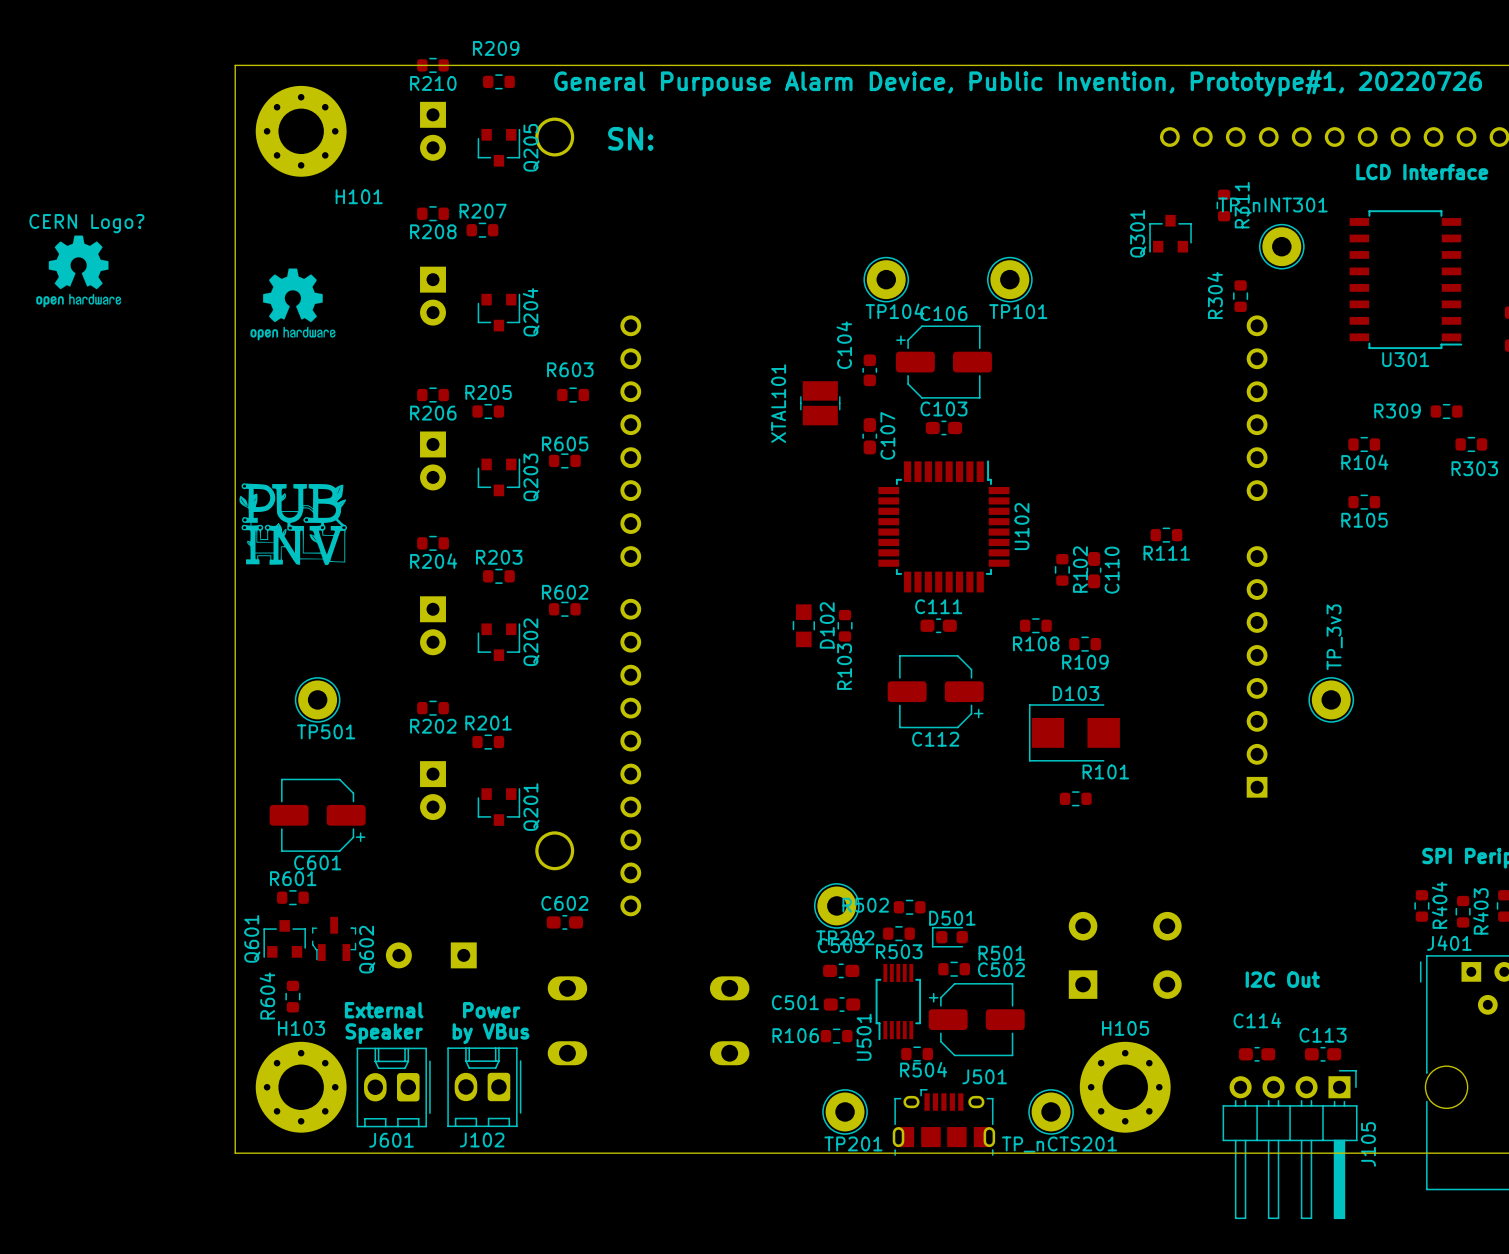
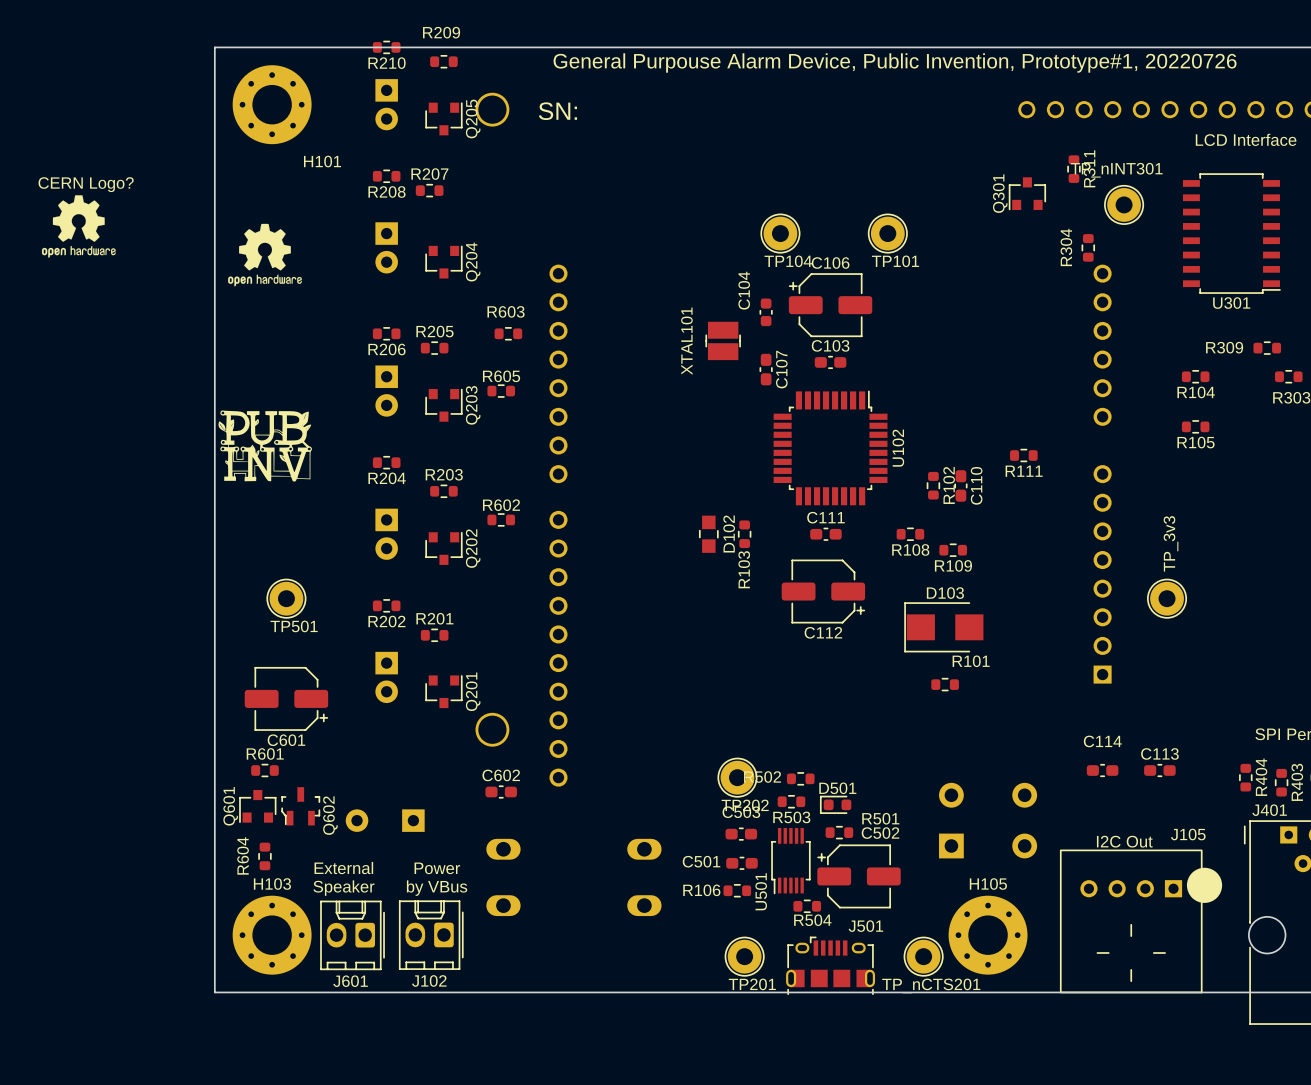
C114 position: (1257, 1054) -> (1102, 770)
C113 position: (1323, 1054) -> (1159, 770)
J105 footprint: [1222, 1069, 1358, 1220] -> [1060, 849, 1223, 994]
J105 name position: J105 (1368, 1144) -> J105 (1188, 834)

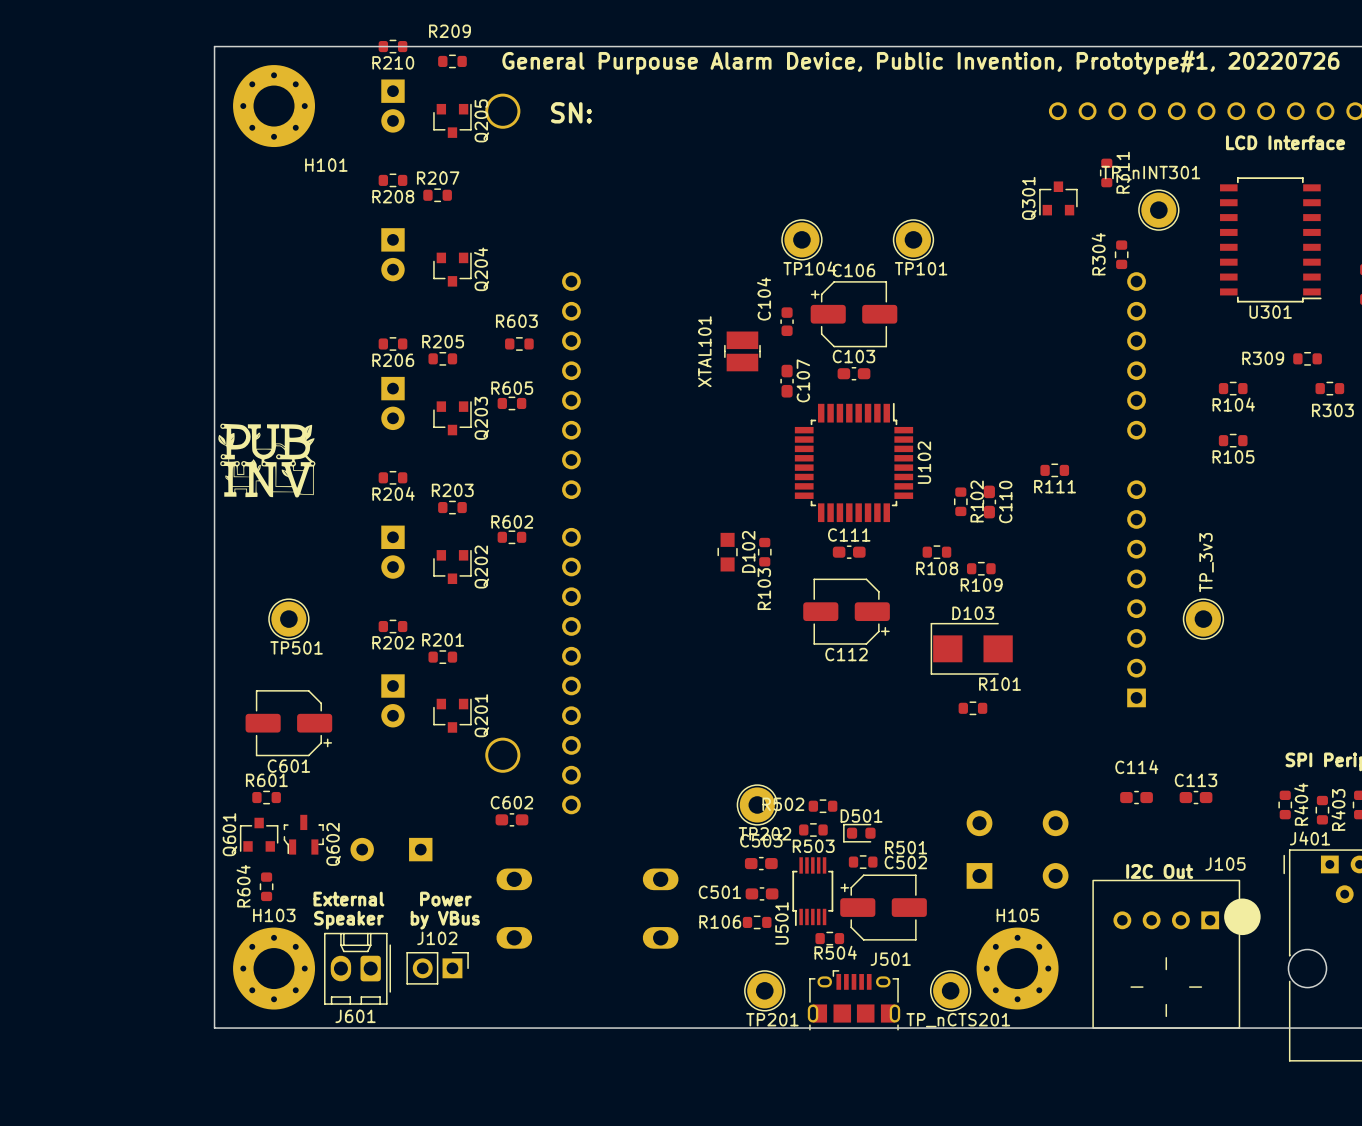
drawing: [41, 195, 116, 258] -> none
drawing: [228, 223, 302, 287] -> none
J102 footprint: [399, 900, 464, 970] -> [406, 952, 469, 985]
J102 name position: J102 (429, 980) -> J102 (437, 938)

